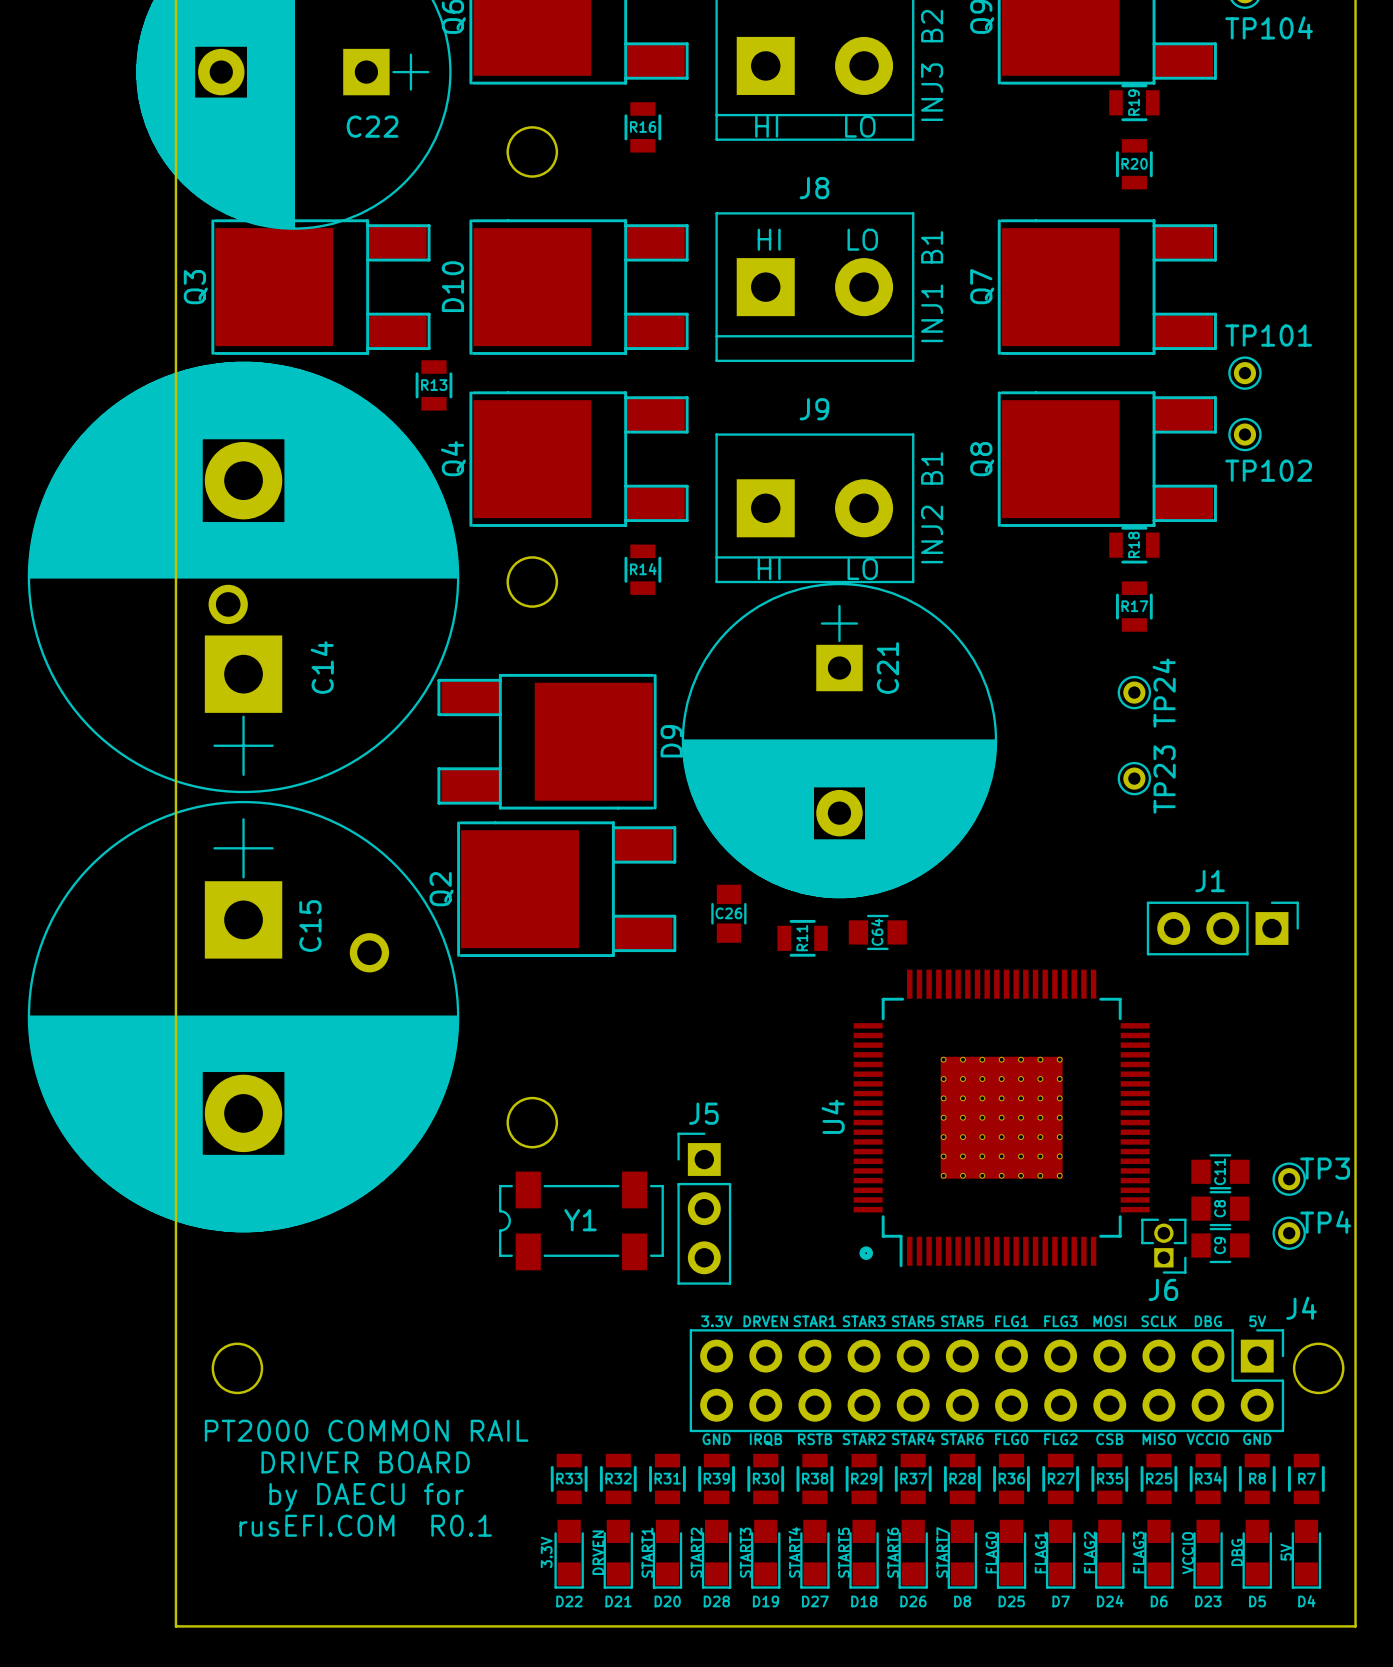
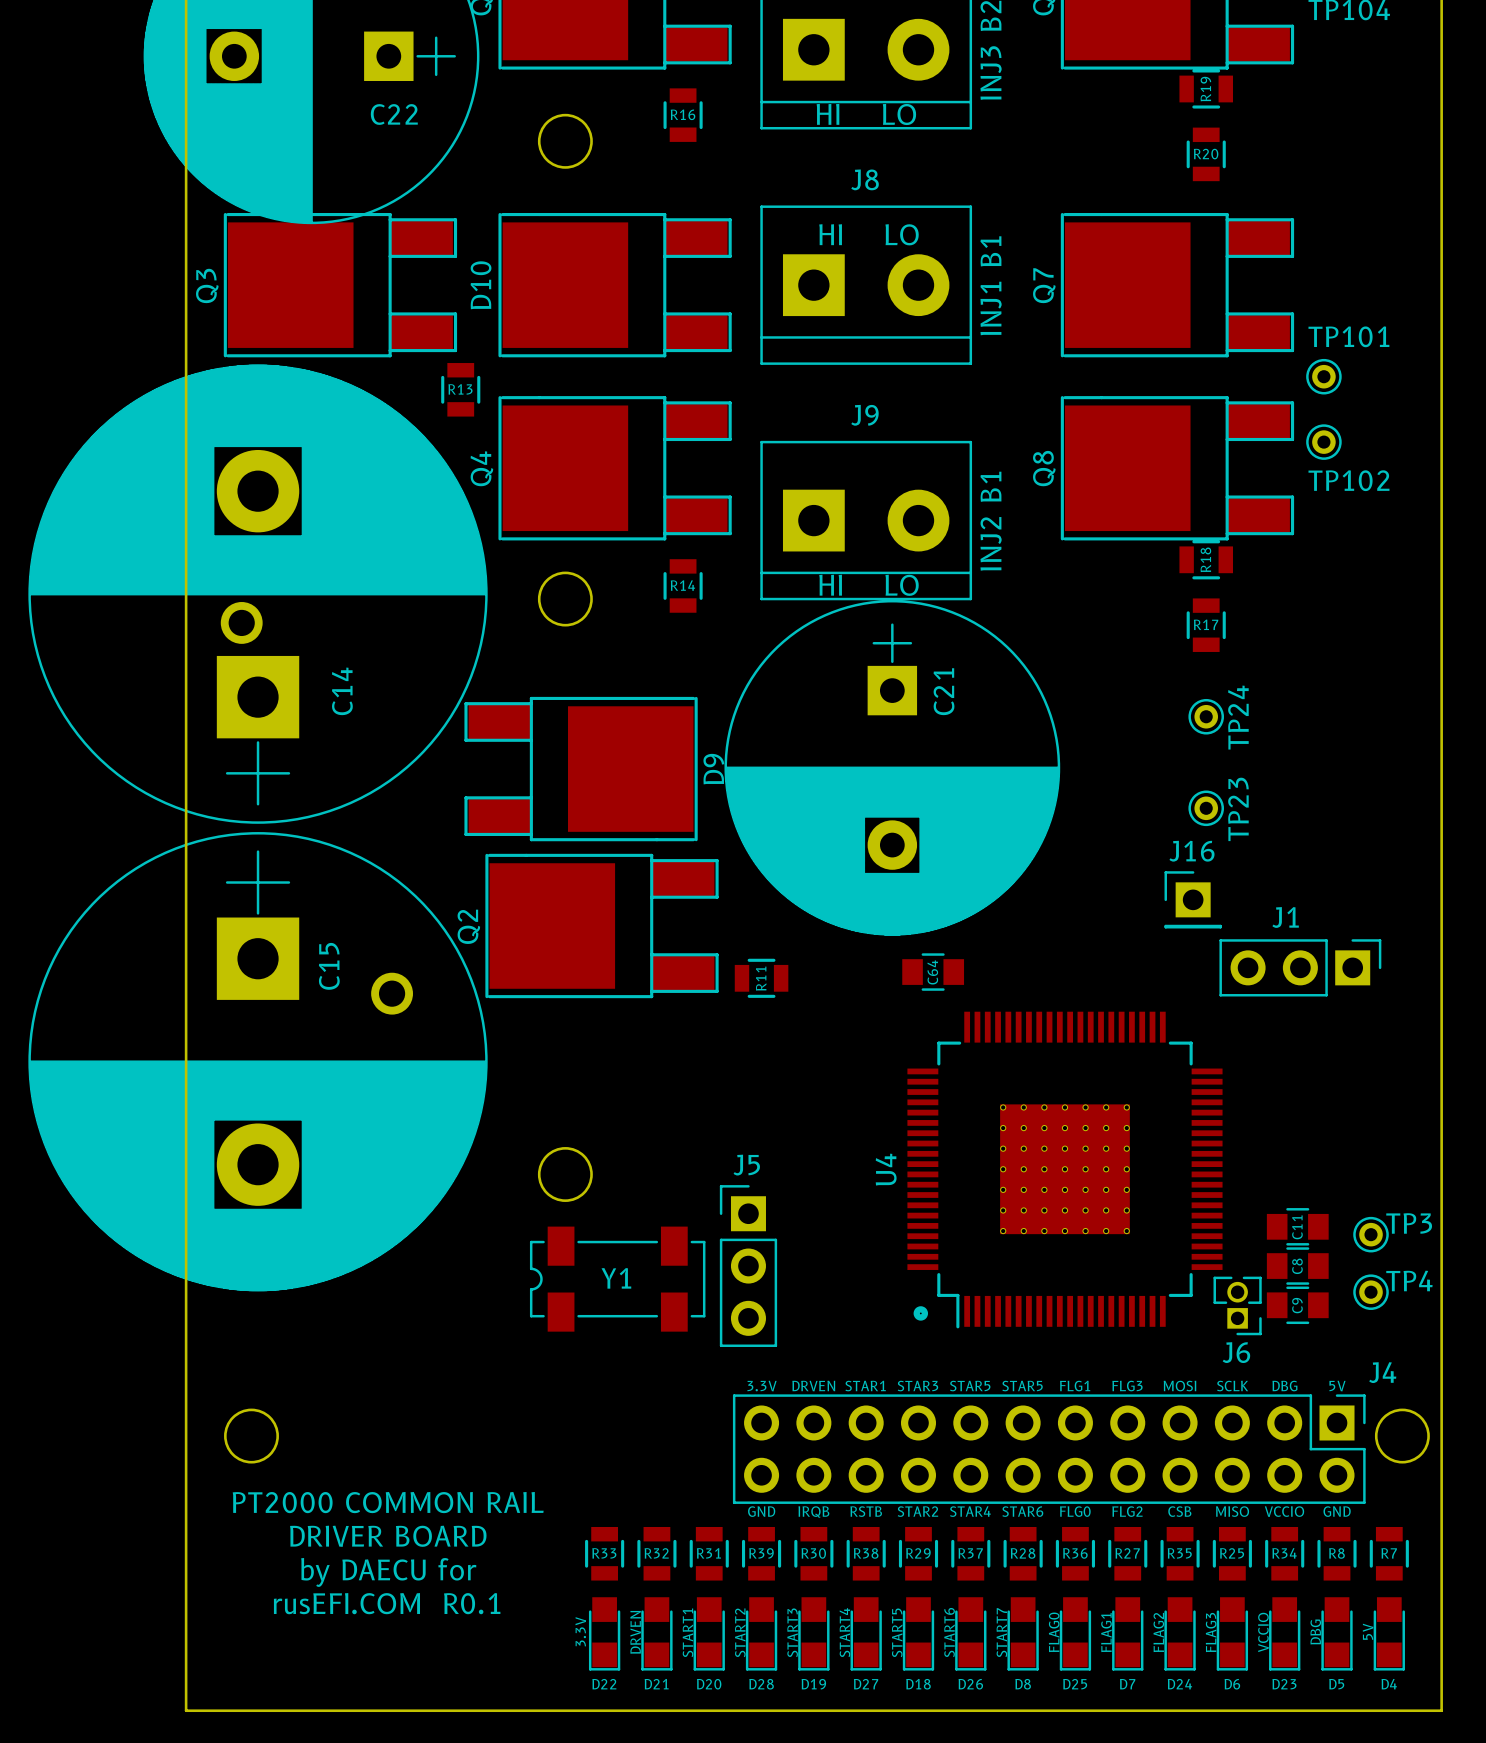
J16: none -> (1193, 899)
C26: (728, 913) -> none
R11 position: (802, 938) -> (761, 978)

